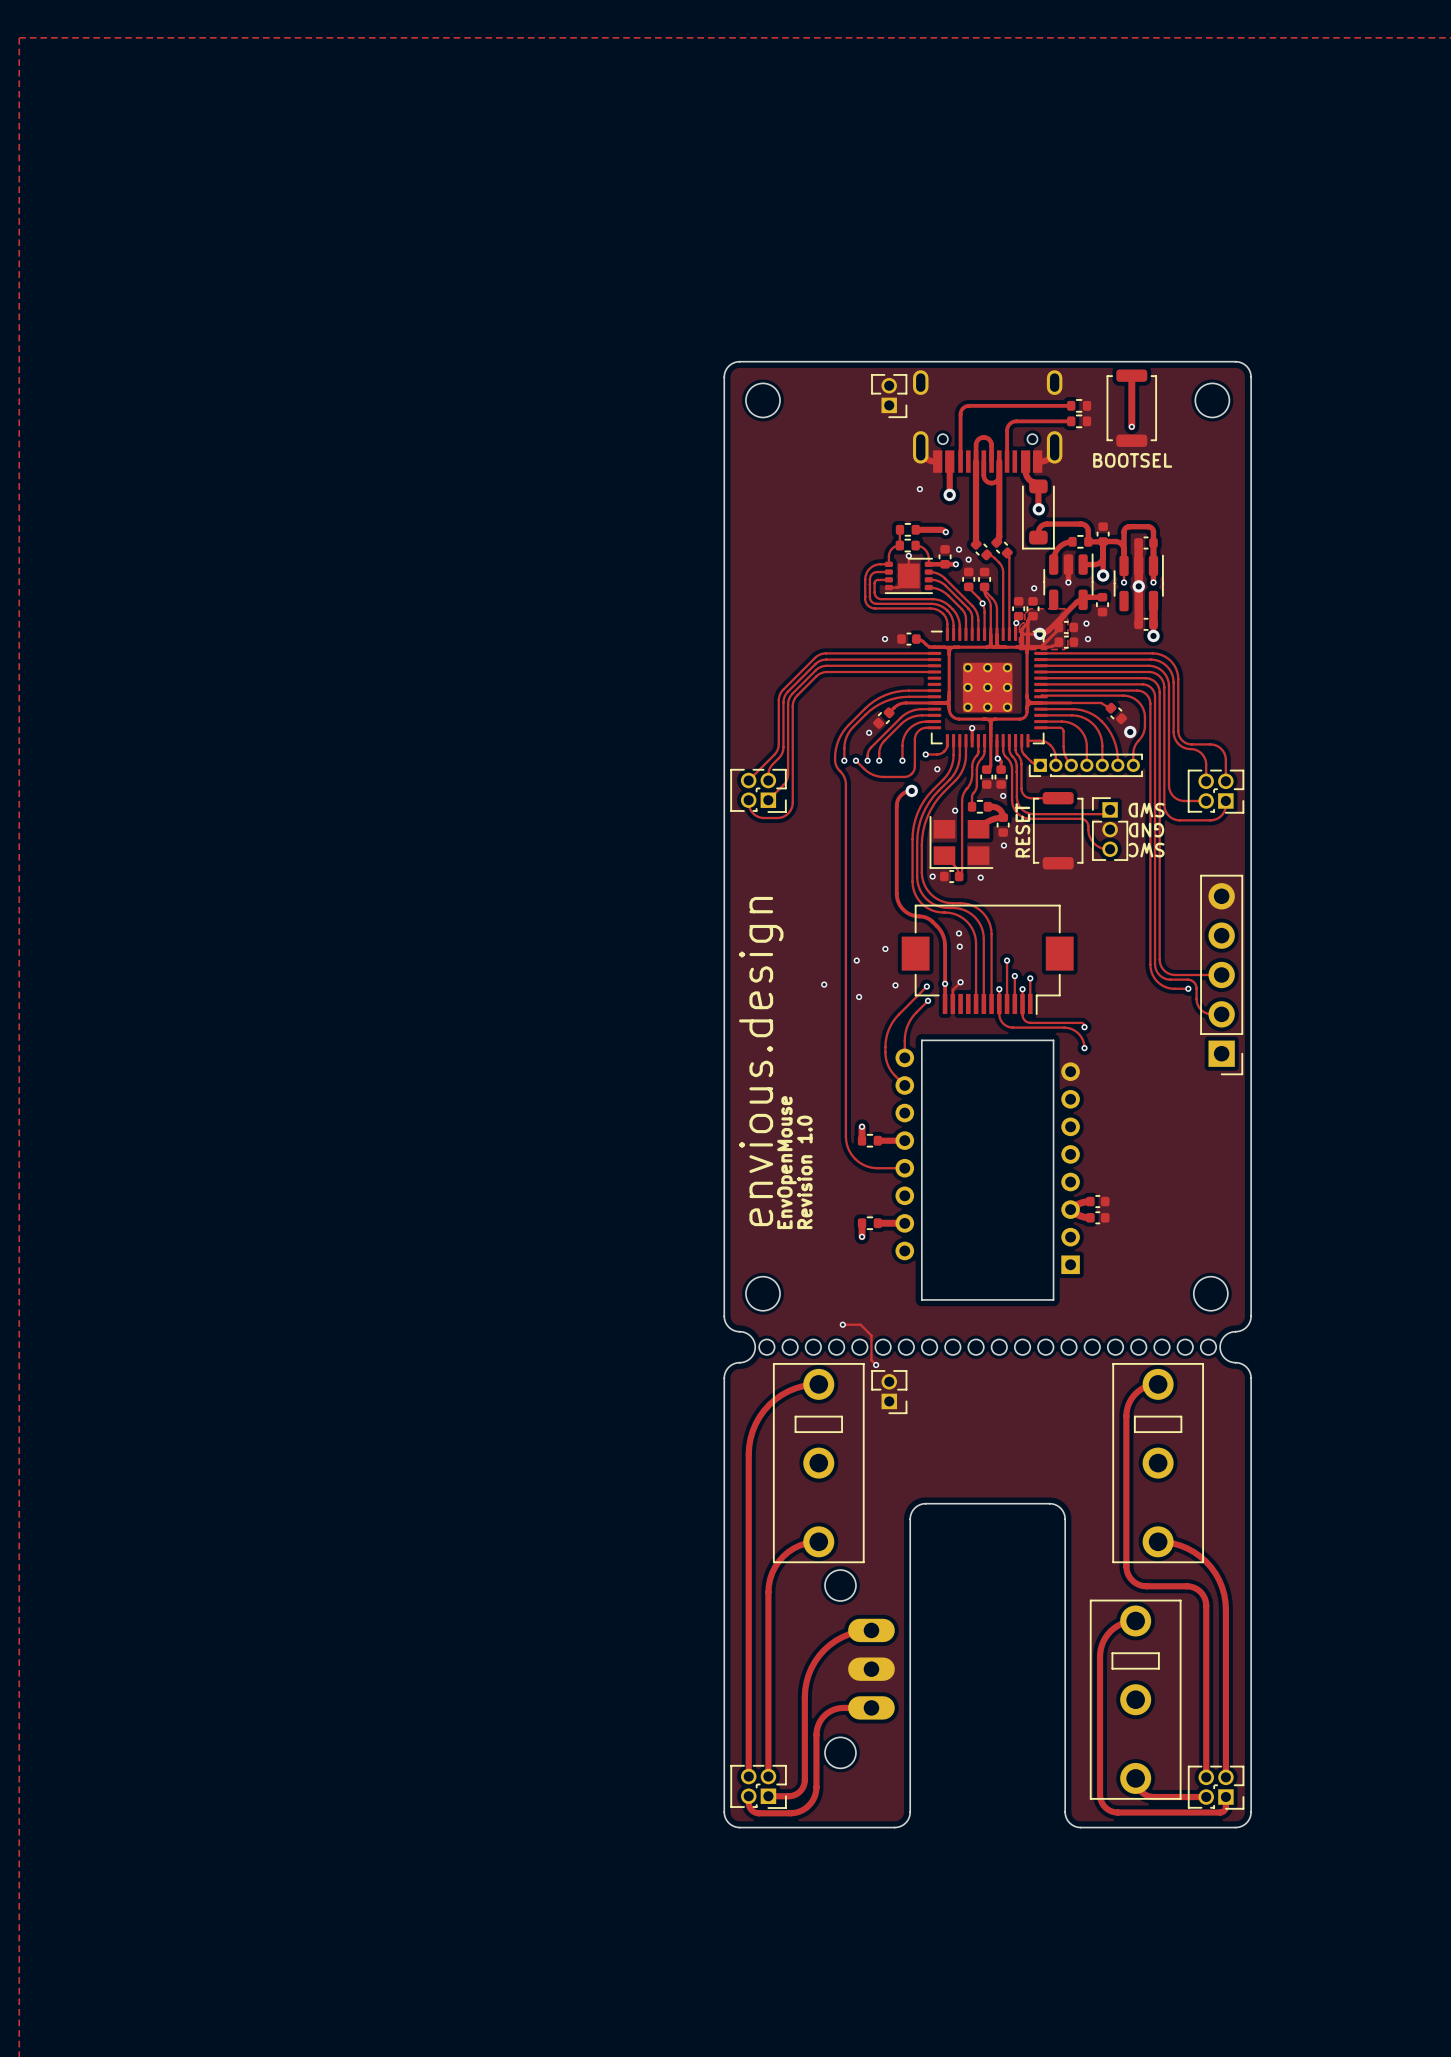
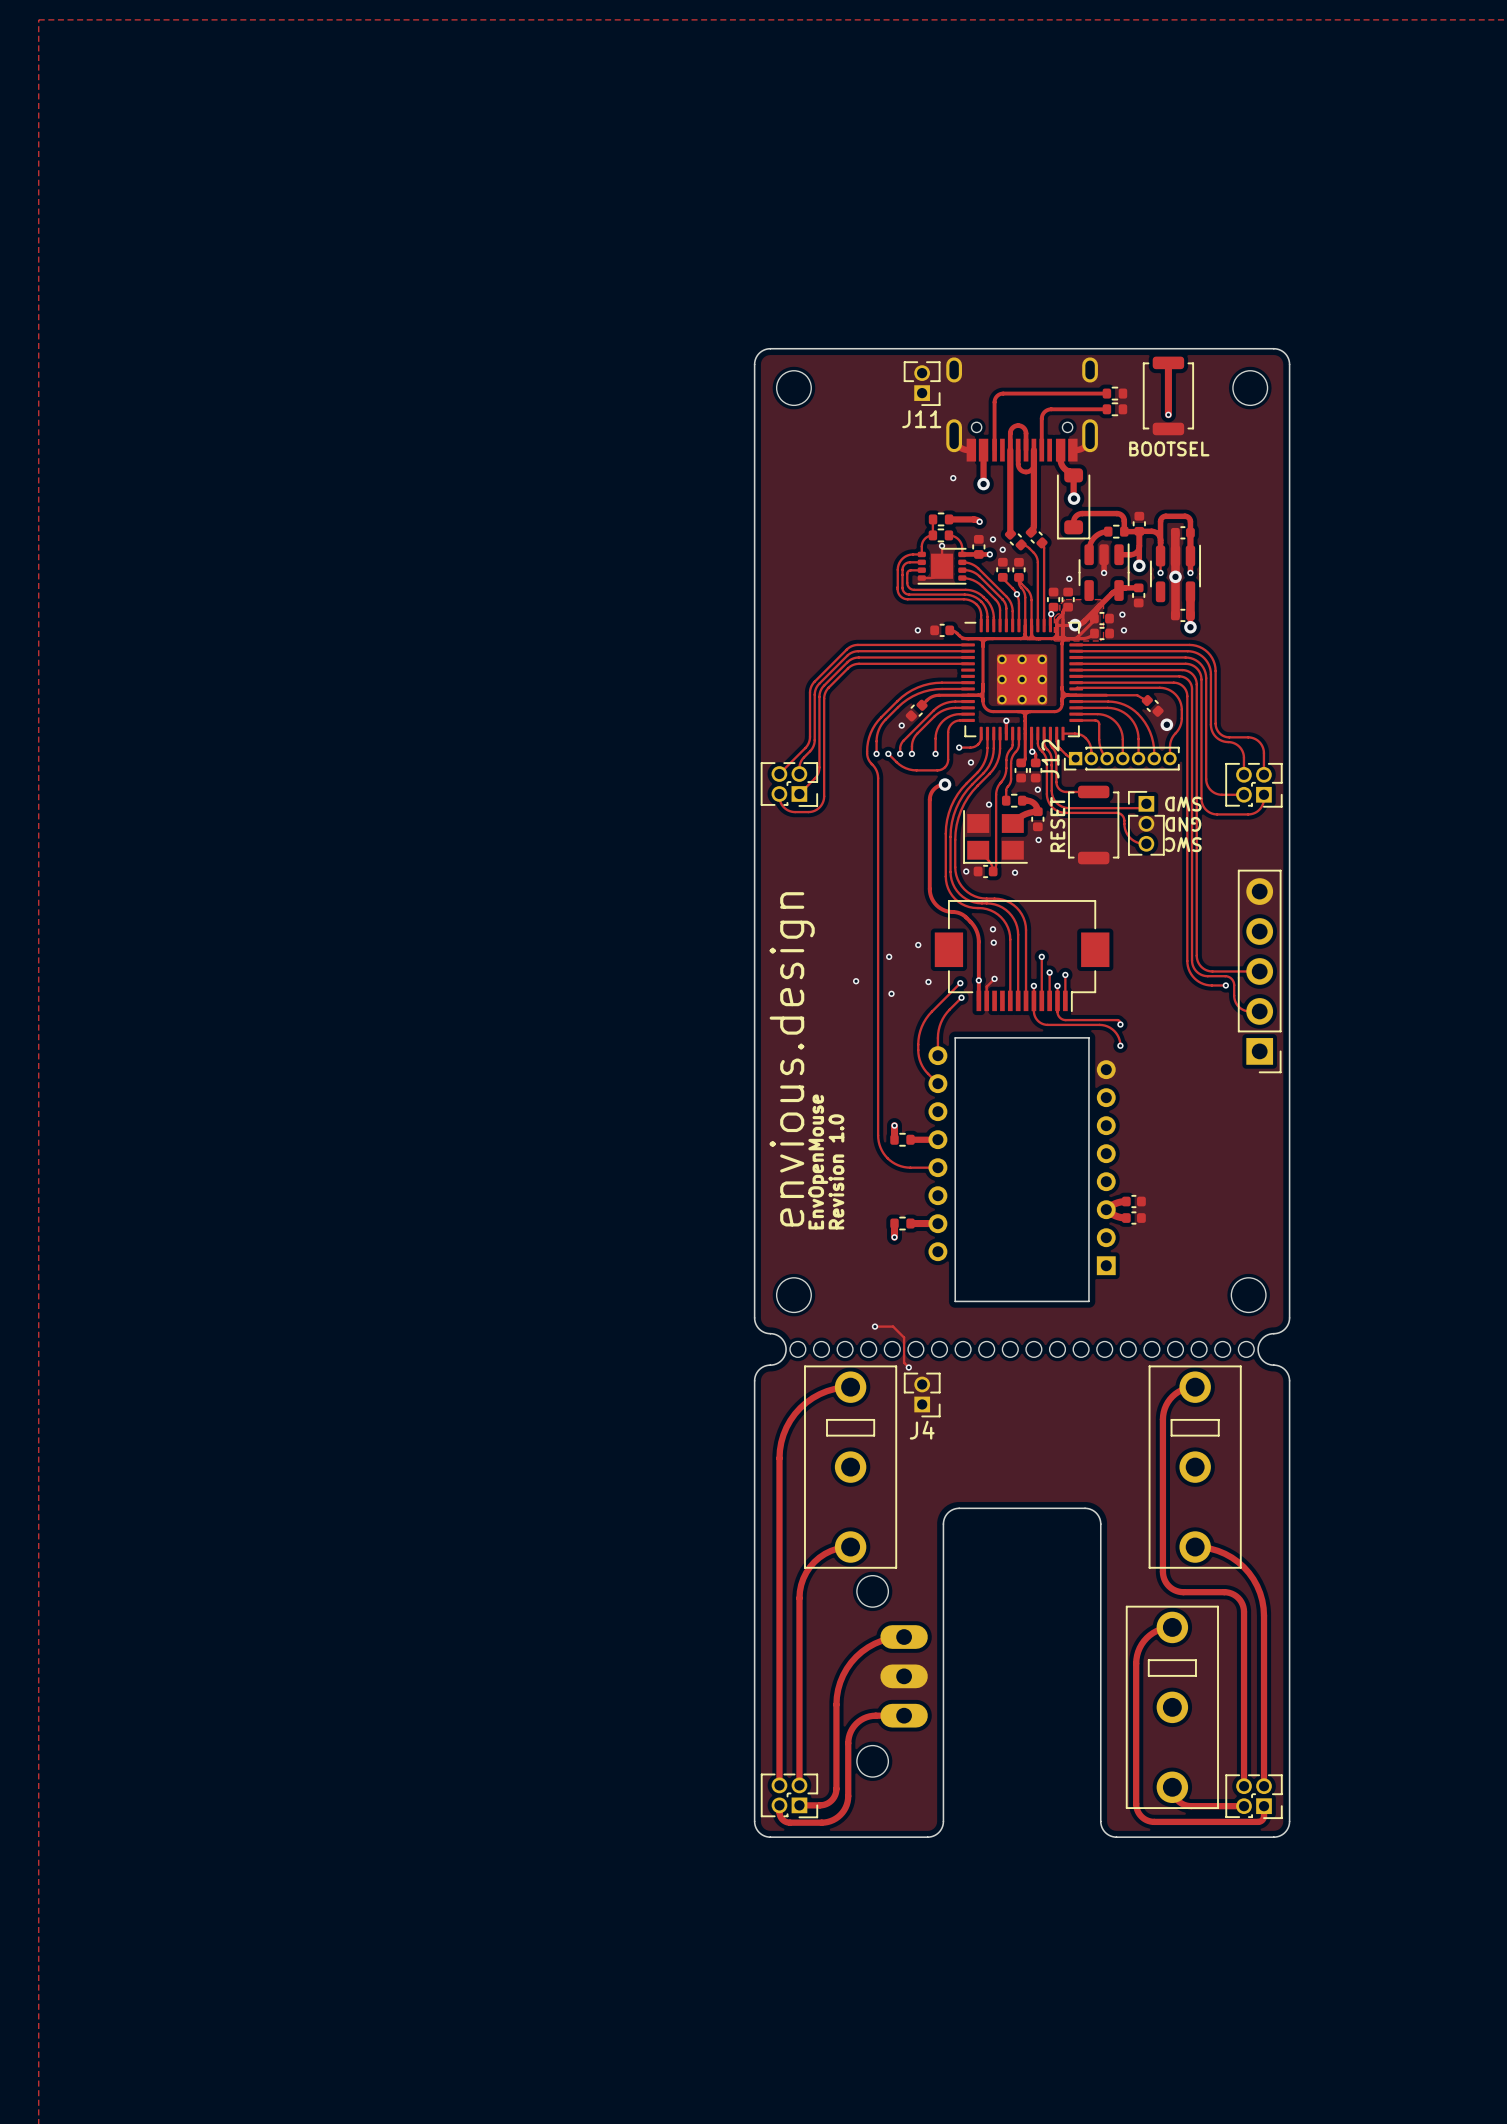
J11 name: none -> J11 (921, 419)
J12 name: none -> J12 (1050, 758)
J4 name: none -> J4 (922, 1430)

